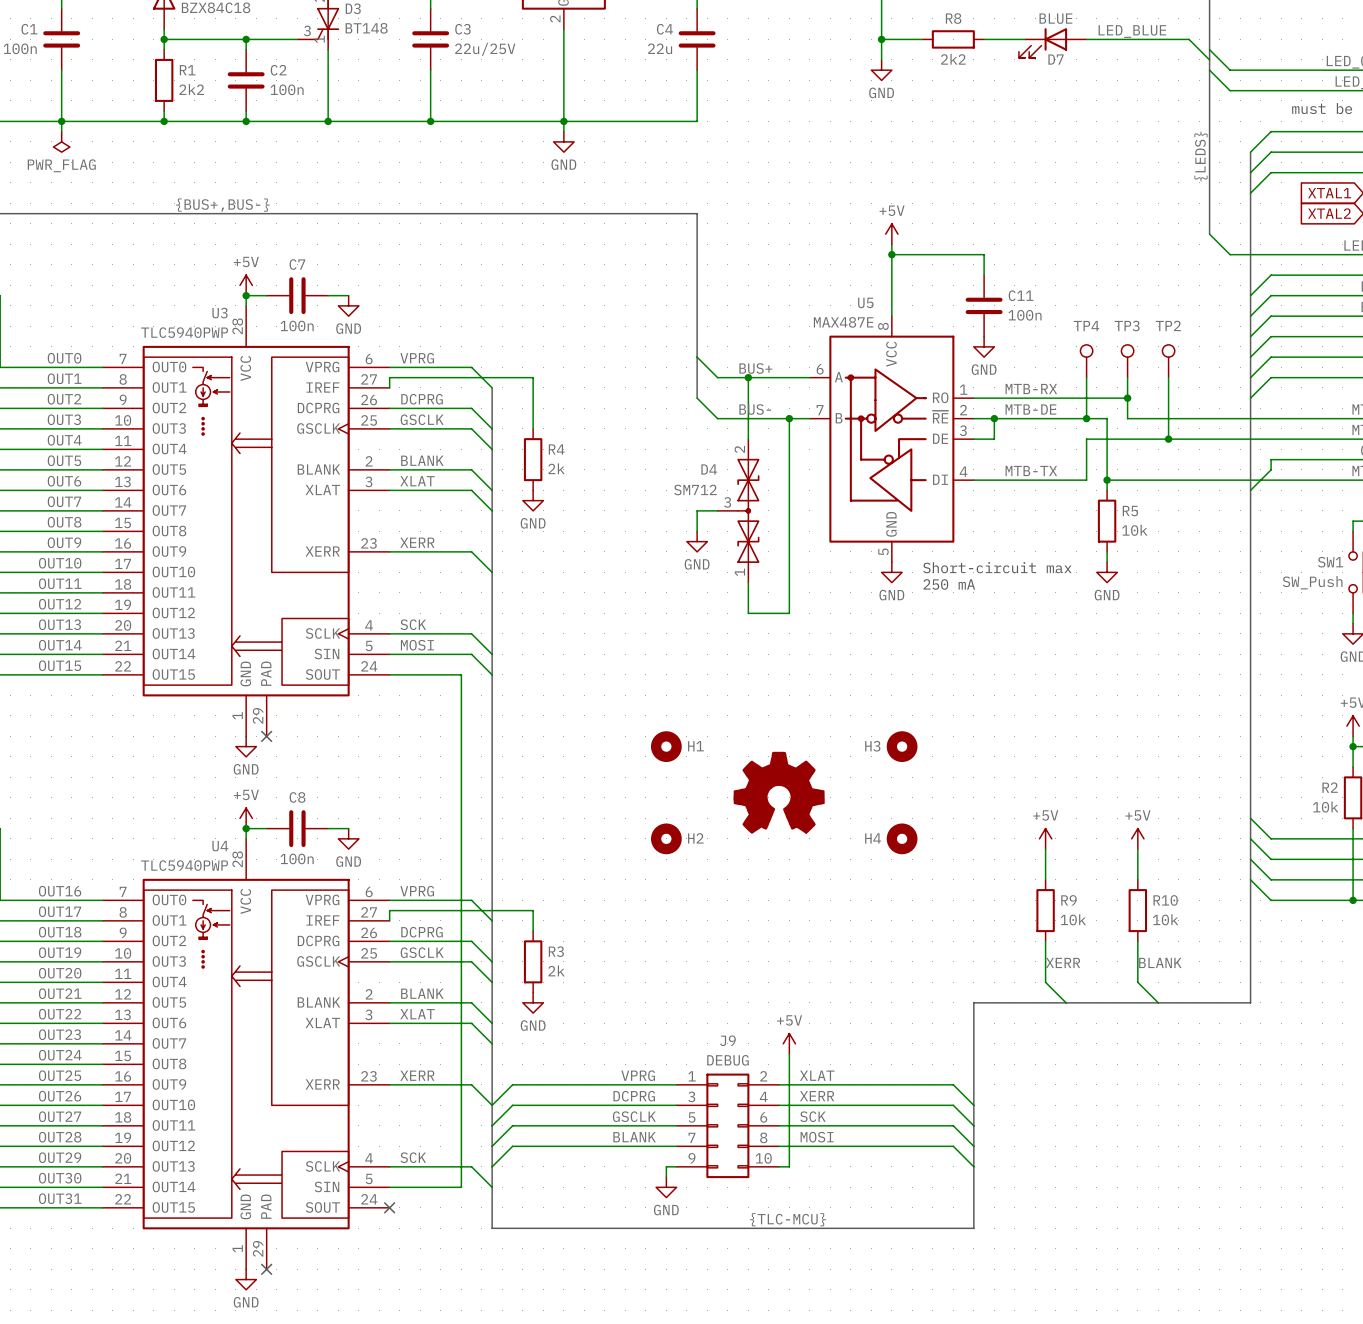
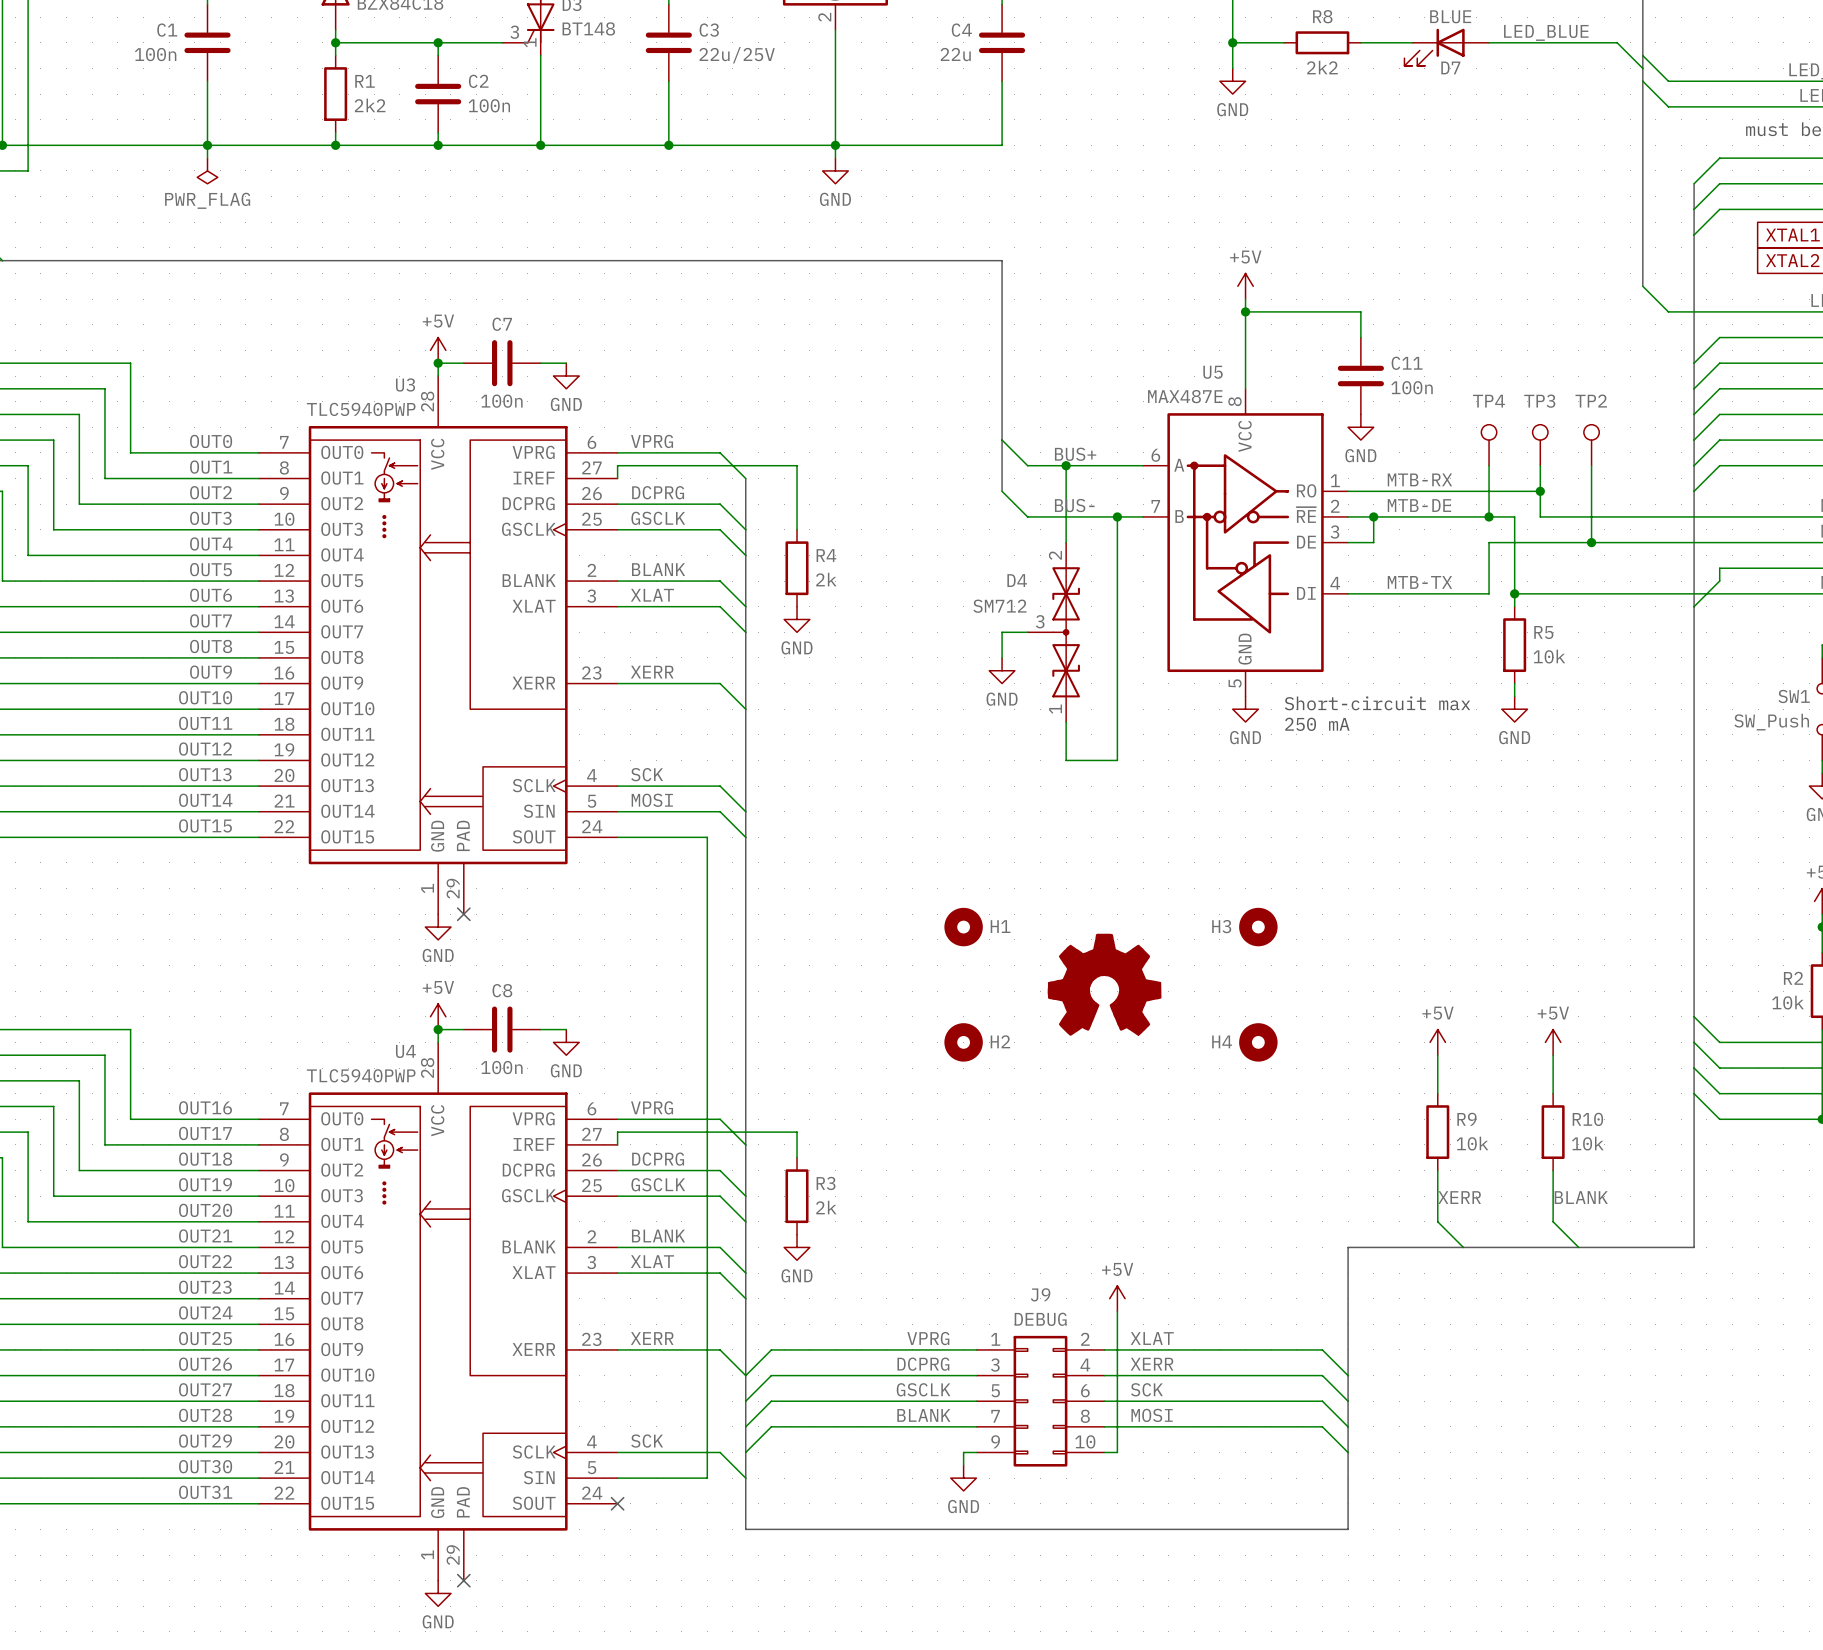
label: {LEDS} (1200, 156) -> none
label: {BUS+,BUS-} (222, 205) -> none
label: {TLC-MCU} (788, 1219) -> none

